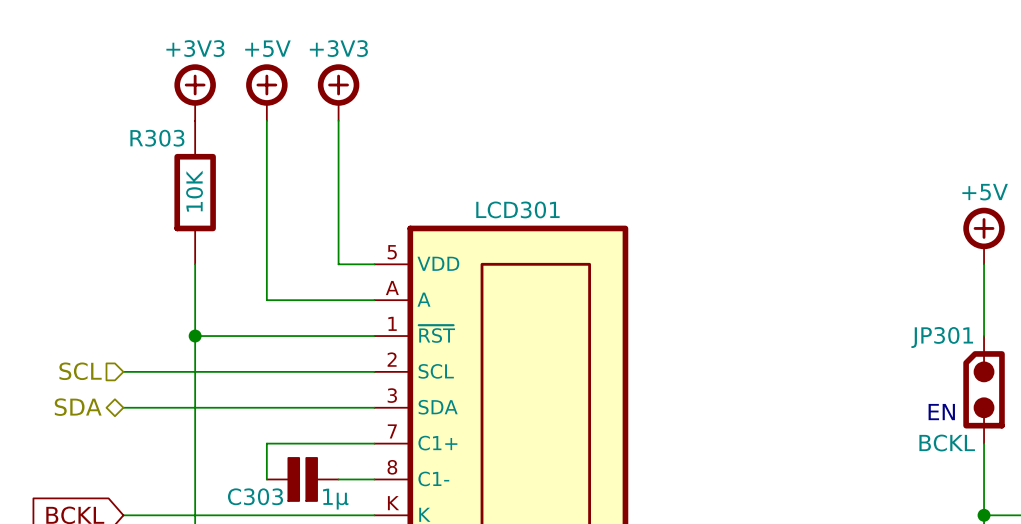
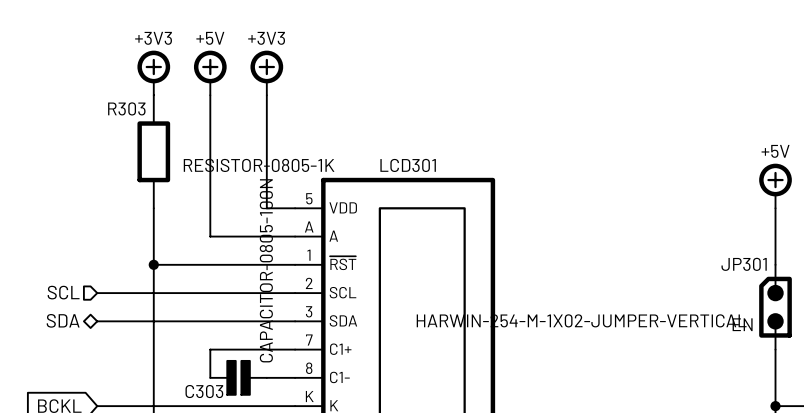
R303 value: 10K (194, 191) -> RESISTOR-0805-1K (259, 165)
JP301 value: BCKL (947, 443) -> HARWIN-254-M-1X02-JUMPER-VERTICAL (581, 320)
C303 value: 1µ (335, 499) -> CAPACITOR-0805-100N (266, 270)

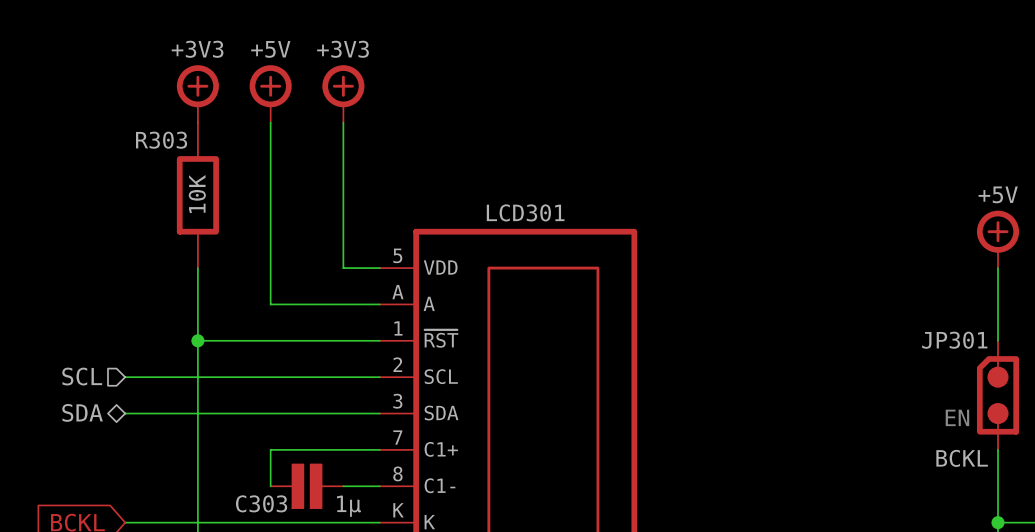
R303 value: RESISTOR-0805-1K (259, 165) -> 10K (197, 194)
C303 value: CAPACITOR-0805-100N (266, 270) -> 1µ (348, 506)
JP301 value: HARWIN-254-M-1X02-JUMPER-VERTICAL (581, 320) -> BCKL (962, 458)

